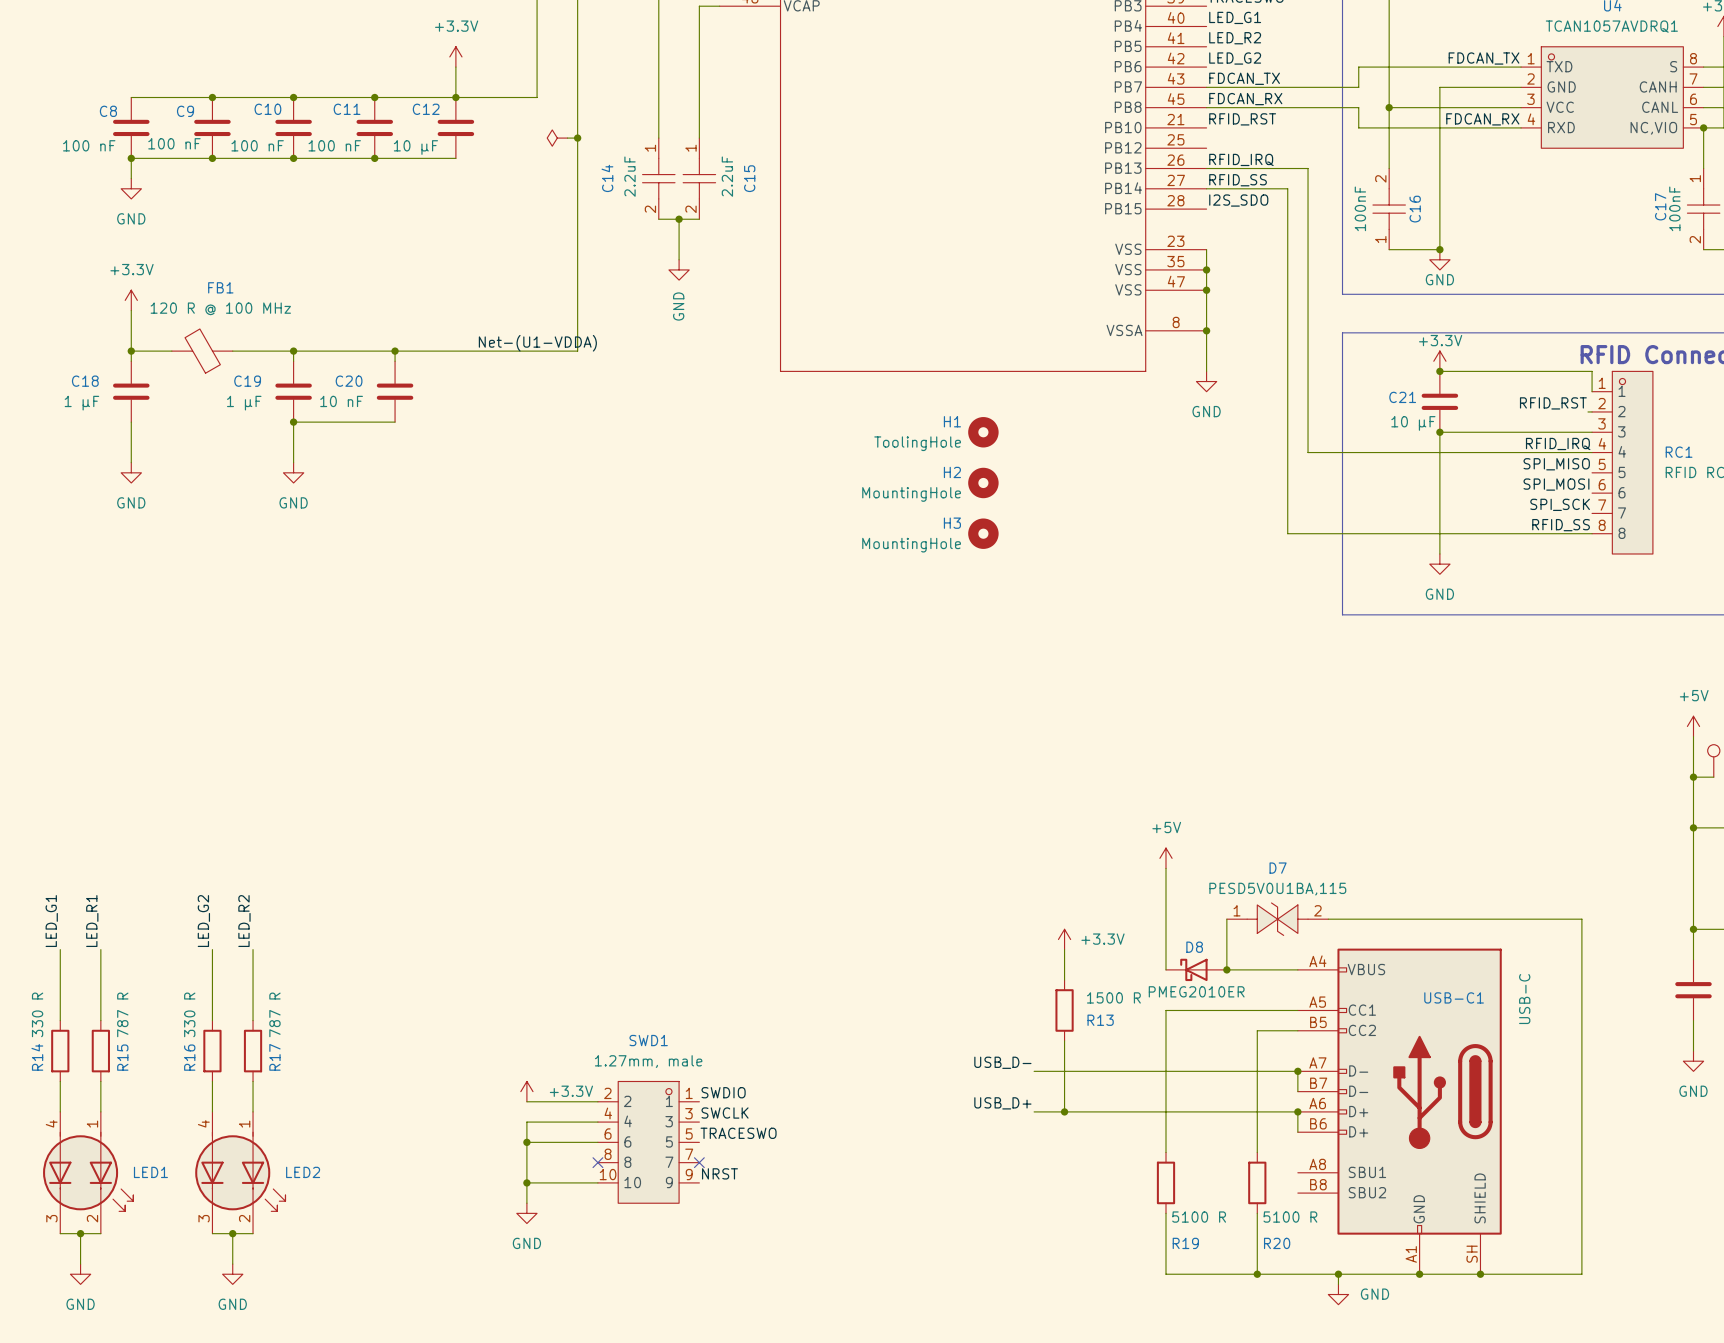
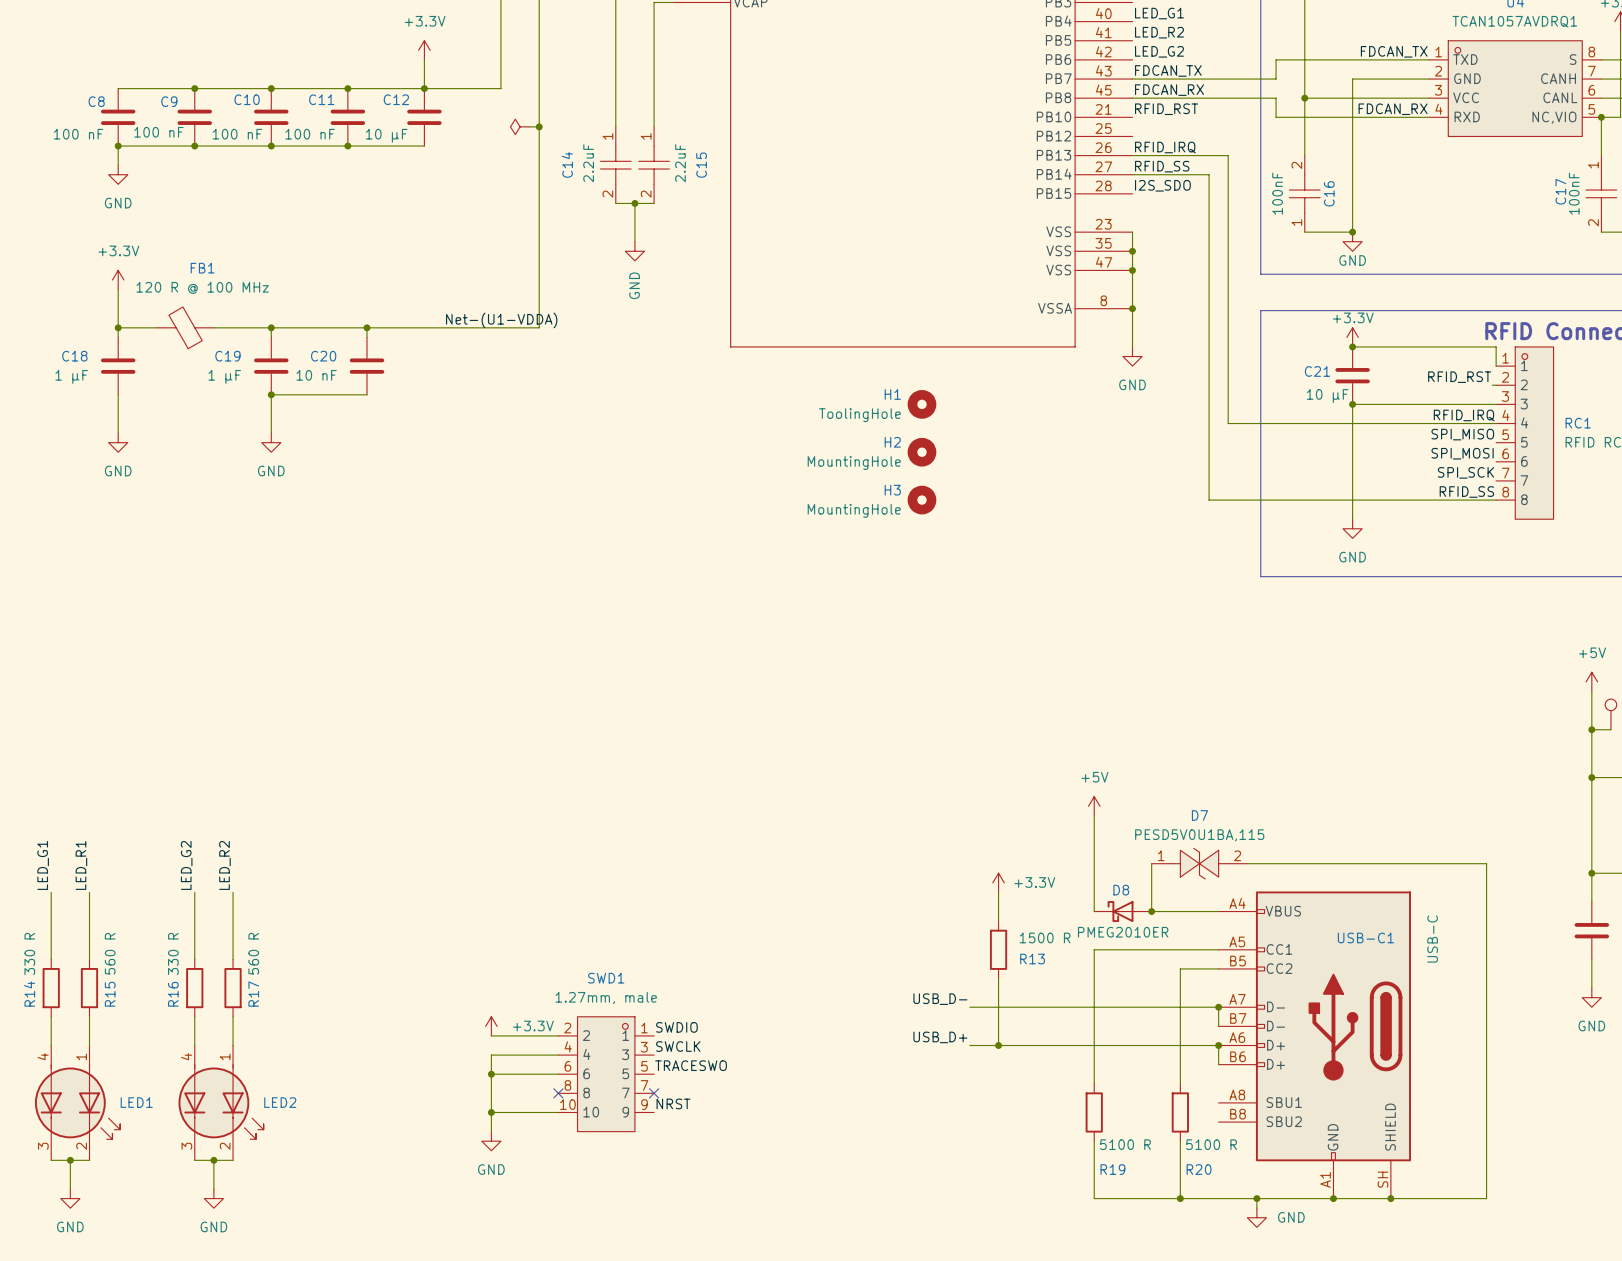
R15 value: 787 R (122, 1014) -> 560 R (110, 953)
R17 value: 787 R (274, 1014) -> 560 R (253, 953)

